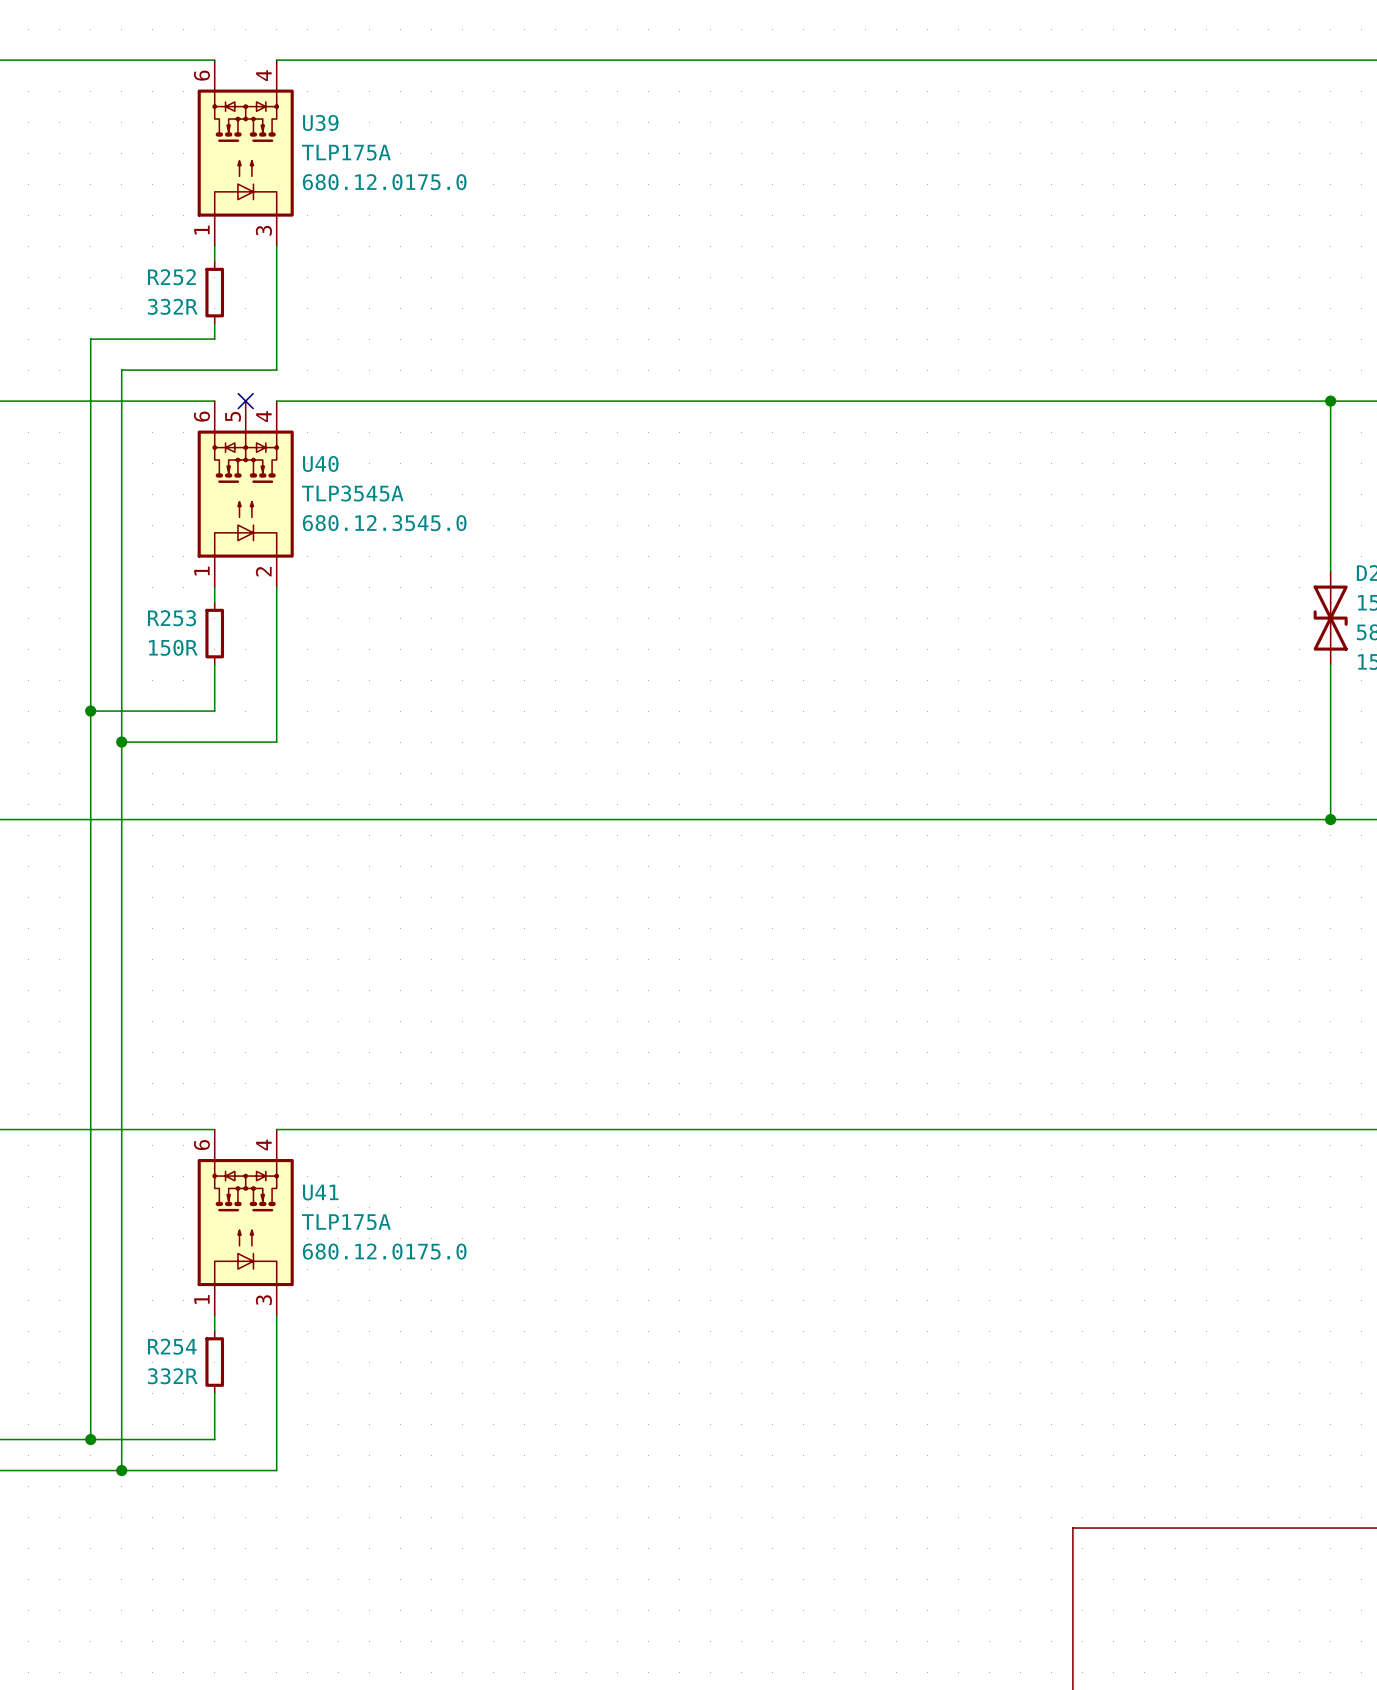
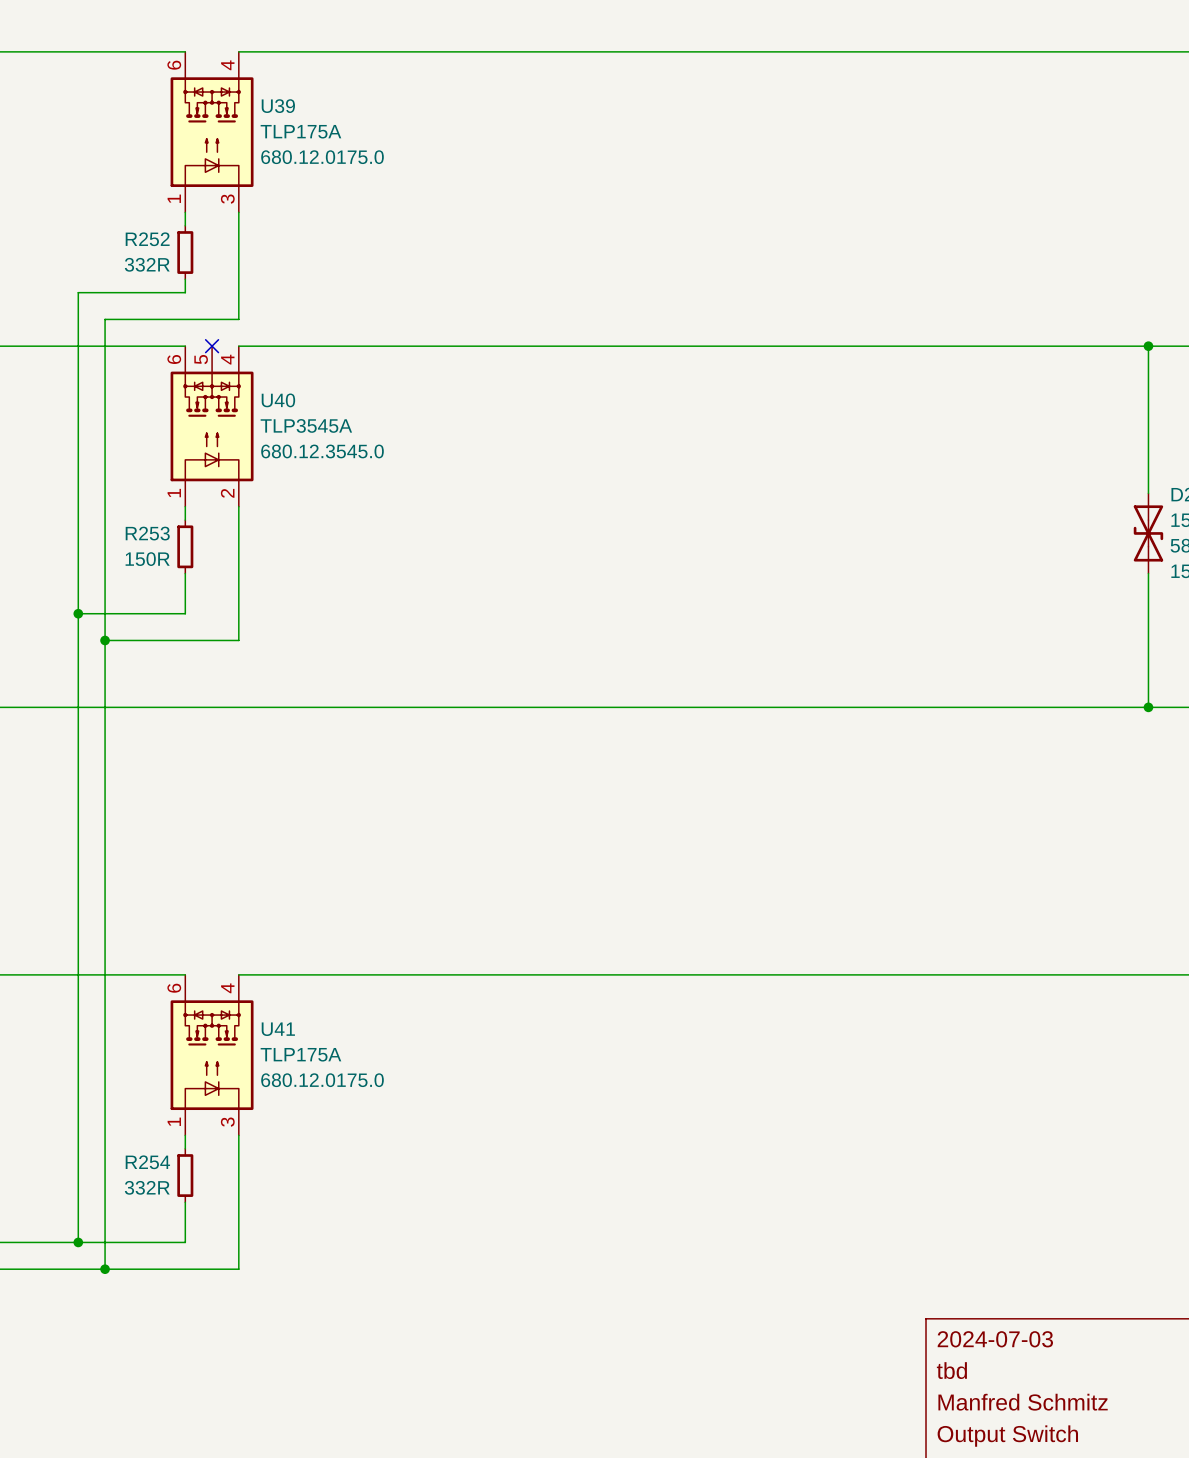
title block: none -> 2024-07-03 (995, 1339)
title block: none -> tbd (951, 1370)
title block: none -> Manfred Schmitz (1023, 1402)
title block: none -> Output Switch (1007, 1436)

